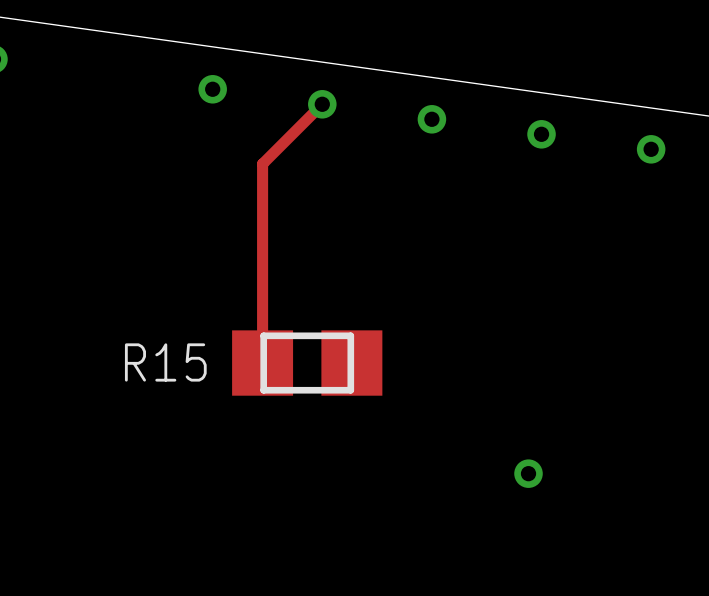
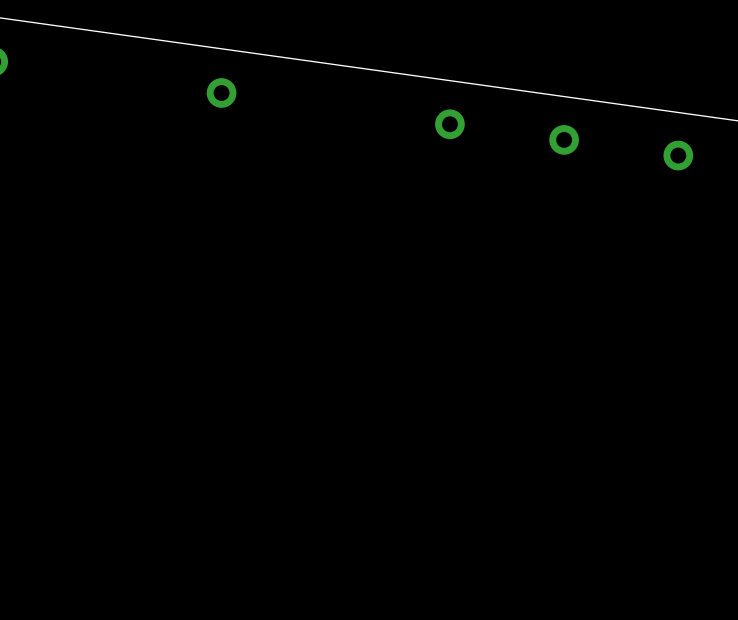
track: (322, 104) (262, 164) (262, 363) (269, 363) -> none
via: (322, 104) -> none
R15: (307, 363) -> none
via: (528, 473) -> none

